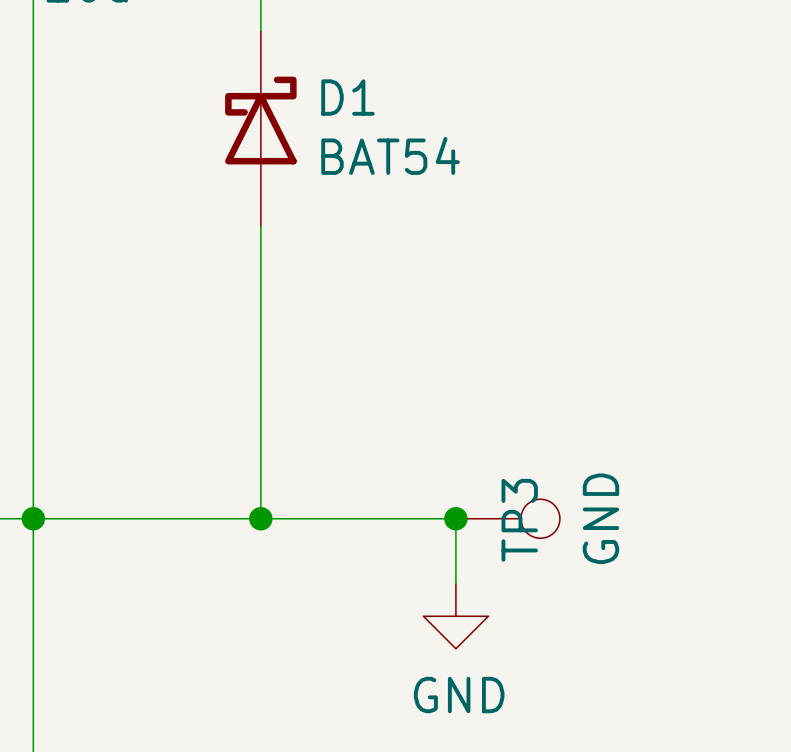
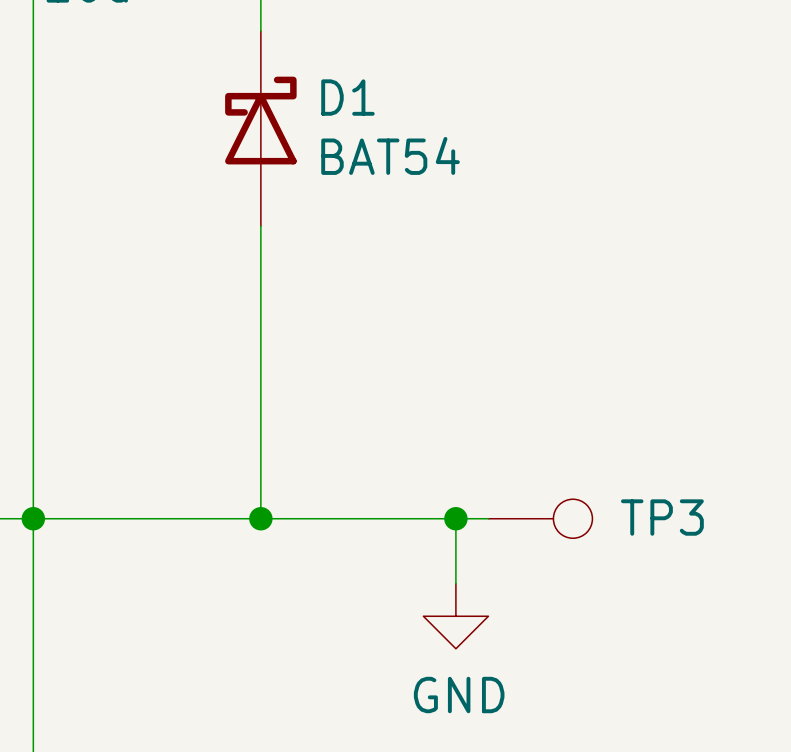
TP3 position: (507, 518) -> (540, 518)
TP3 value: GND (600, 518) -> none
TP3 name rotation: 0° (519, 520) -> 90° clockwise (662, 517)
TP3 name position: TP3 (519, 520) -> TP3 (662, 517)

